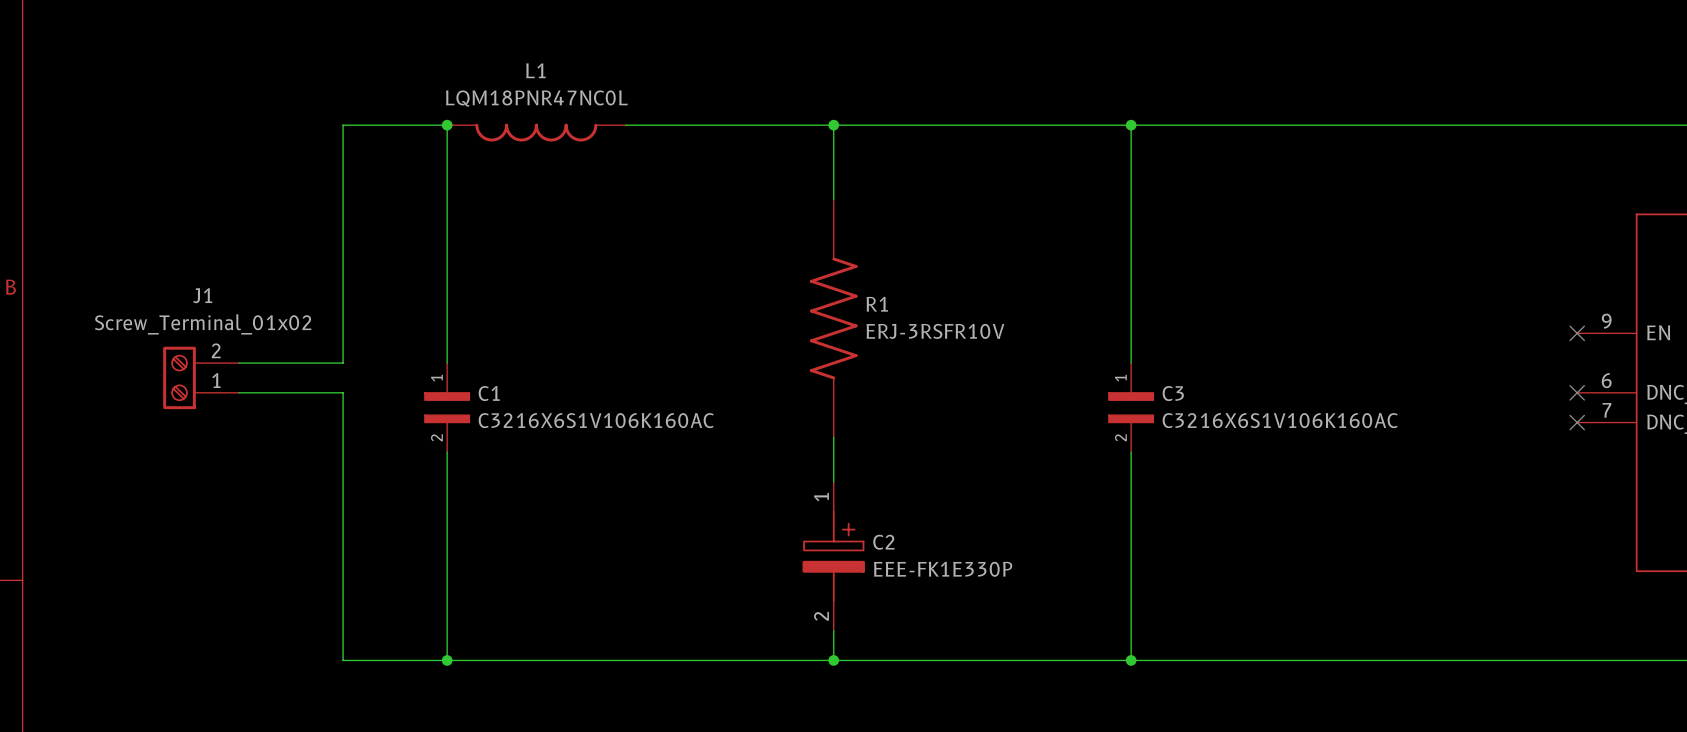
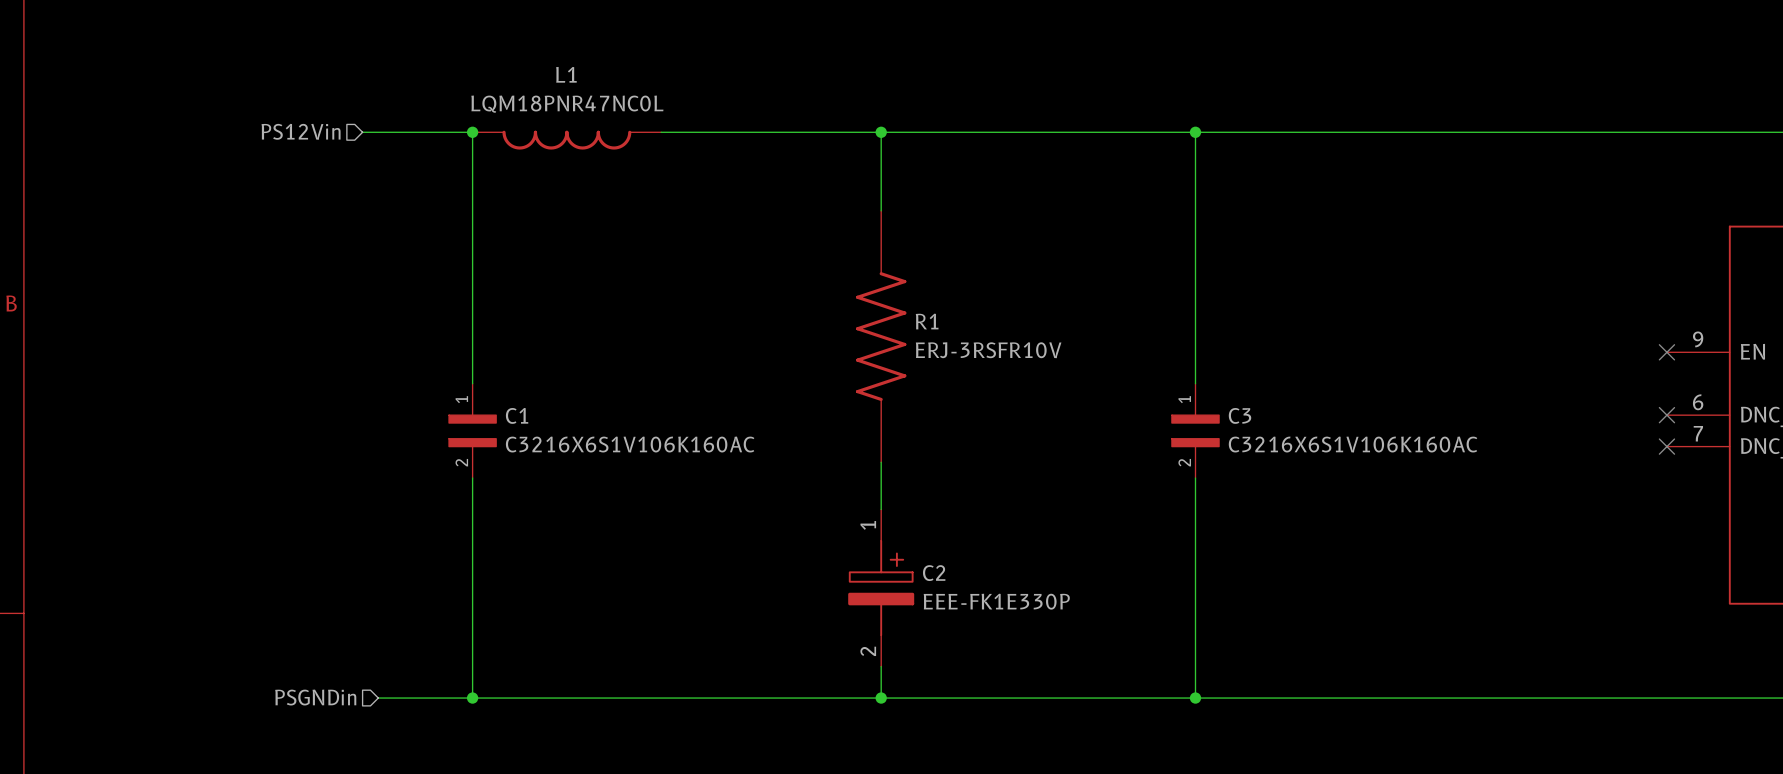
hierarchical label: none -> PS12Vin (301, 131)
wire: (343, 125) (343, 363) (238, 363) -> none
J1: Screw_Terminal_01x02 (201, 377) -> none
wire: (238, 392) (343, 392) (343, 660) (357, 660) -> none
hierarchical label: none -> PSGNDin (315, 697)

